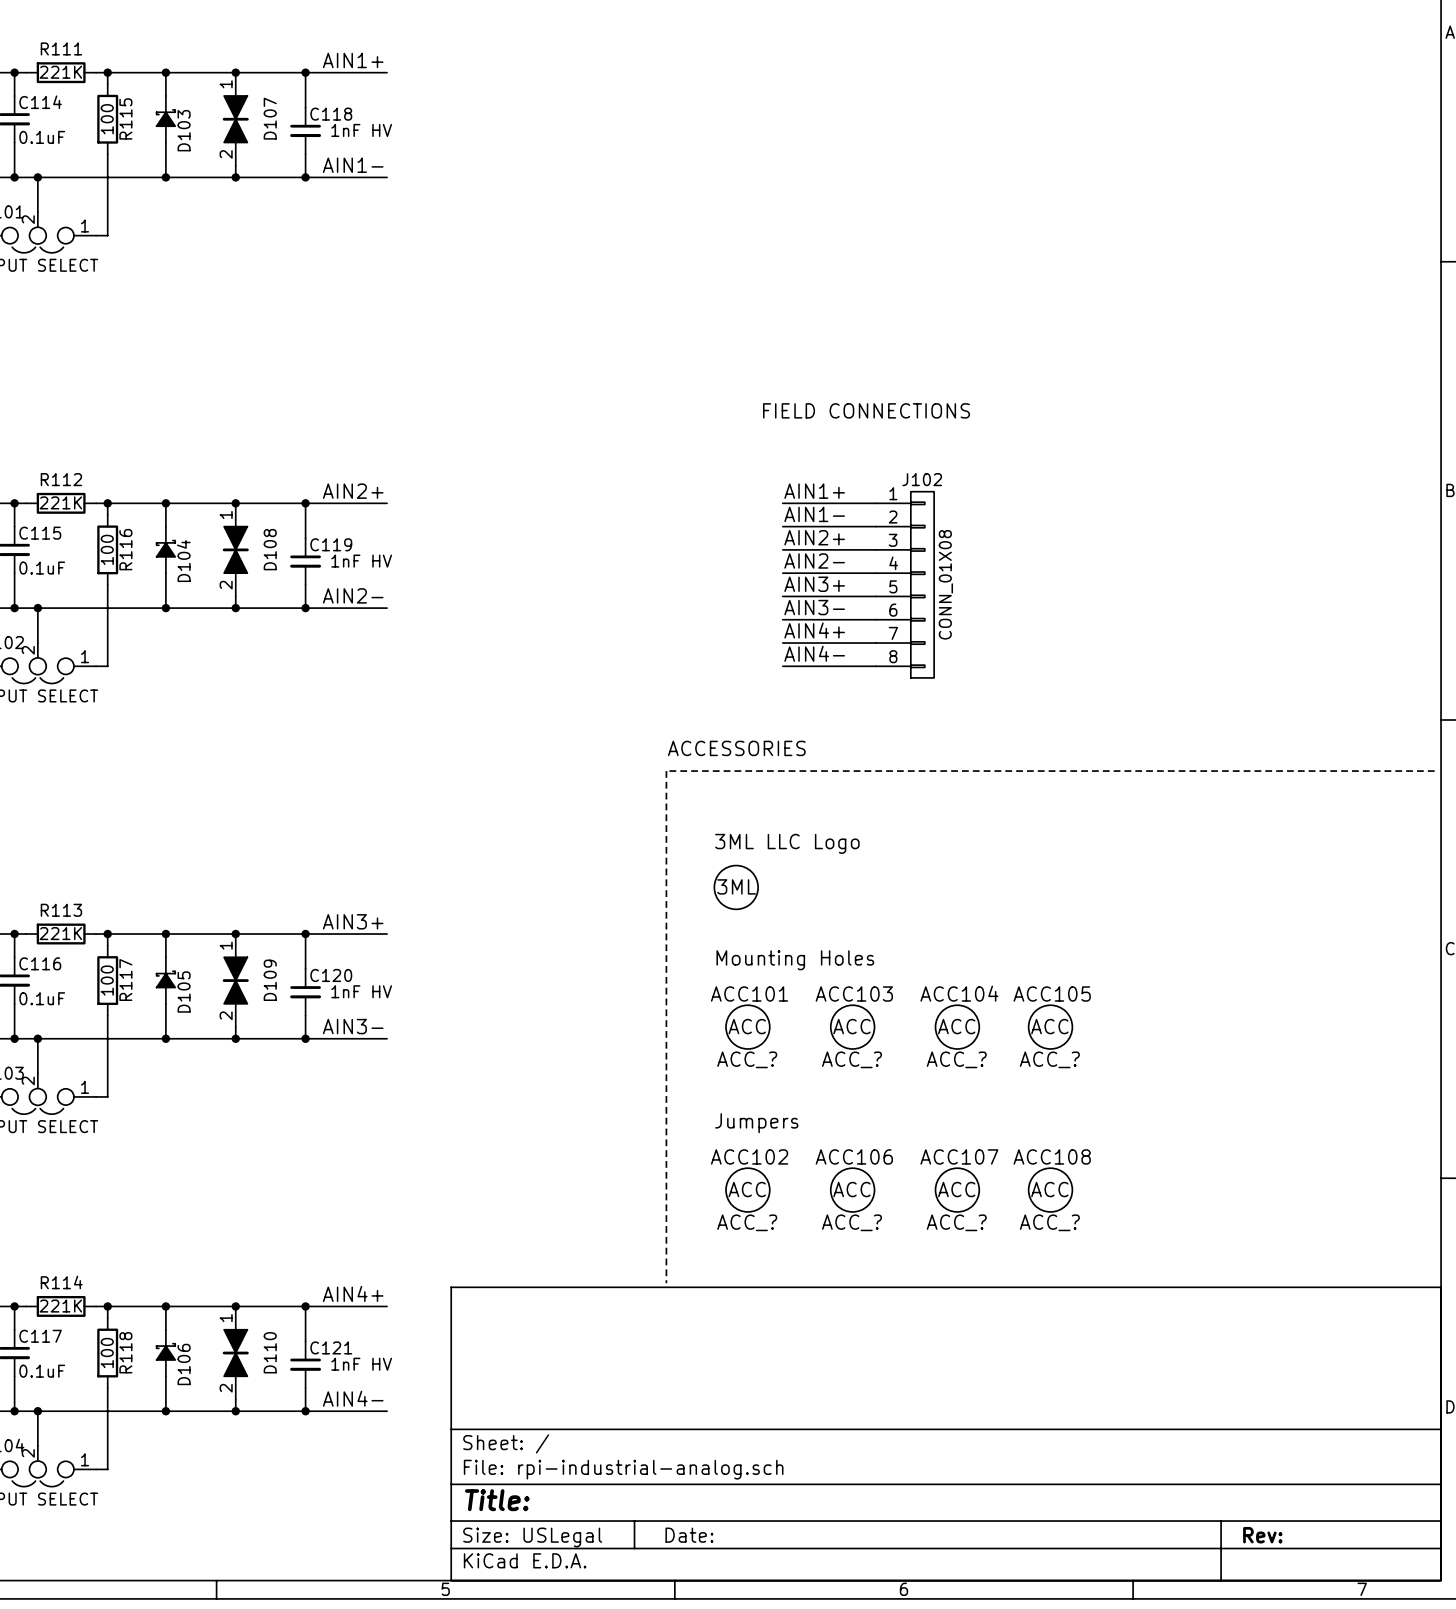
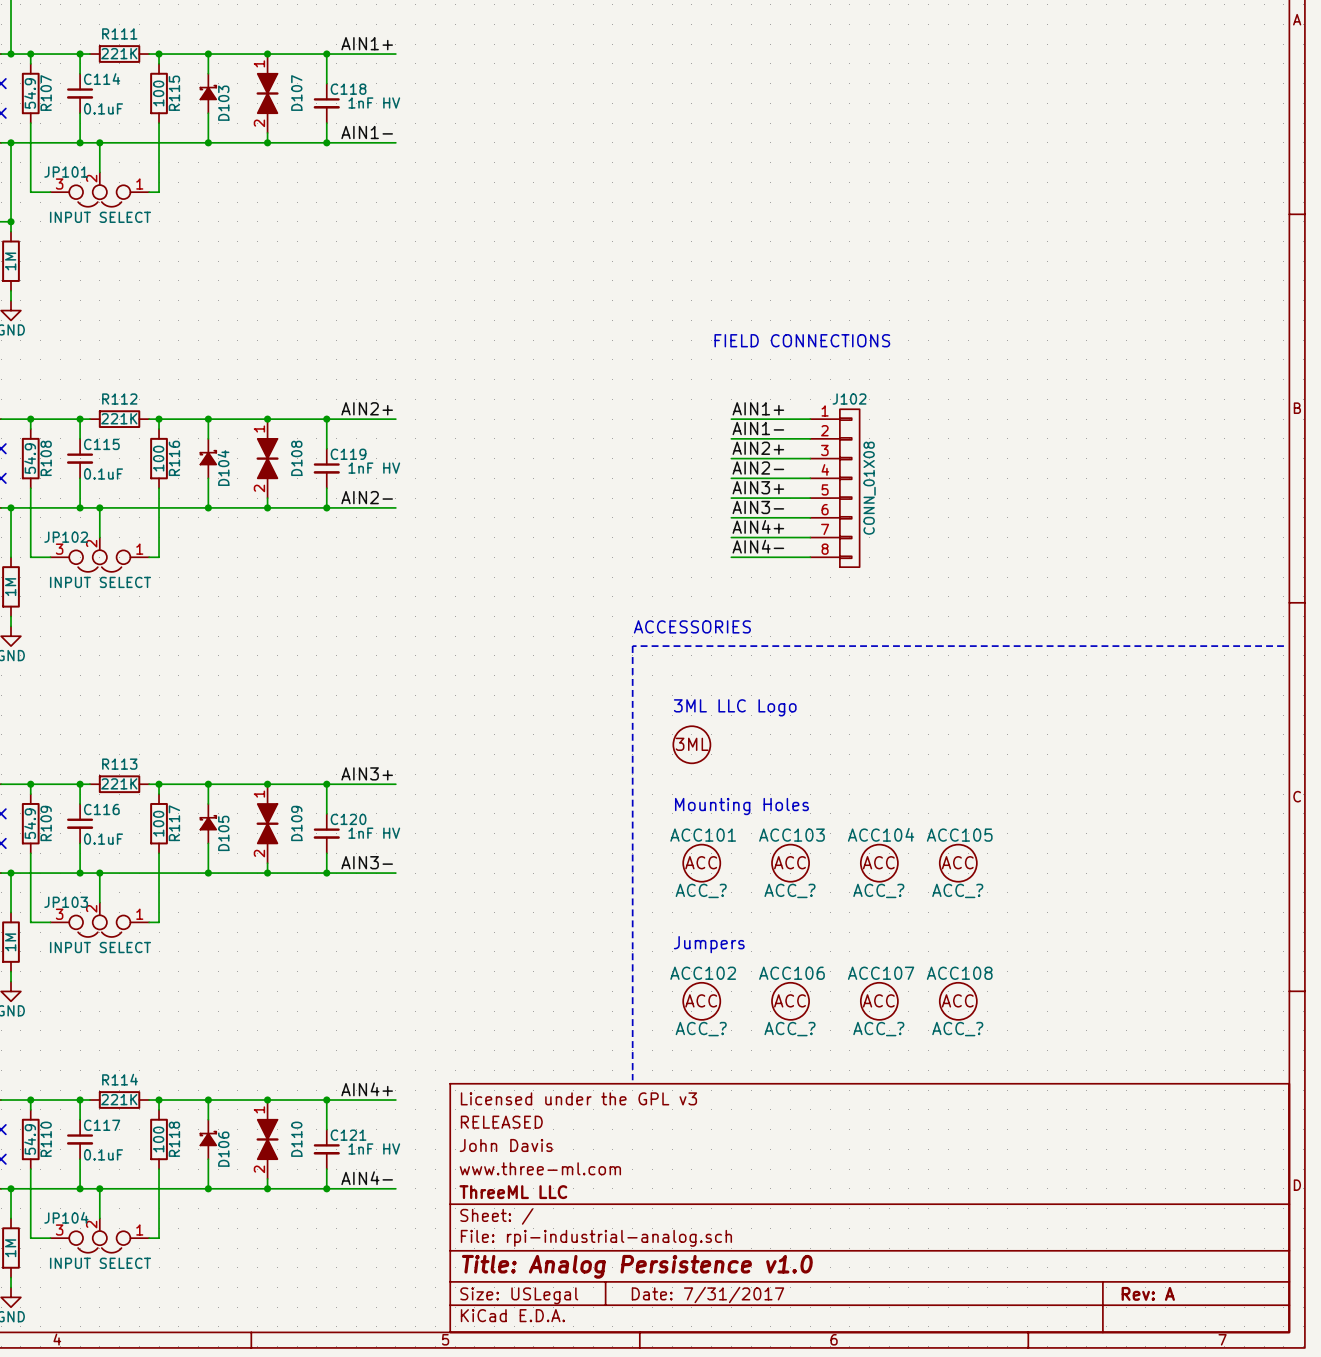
title block: none -> Licensed under the GPL v3 (578, 1098)
title block: none -> RELEASED (501, 1122)
title block: none -> John Davis (506, 1145)
title block: none -> www.three-ml.com (540, 1168)
title block: none -> ThreeML LLC (513, 1192)
title block: Title: (497, 1500) -> Title: Analog Persistence v1.0 (637, 1266)
title block: Date: (689, 1535) -> Date: 7/31/2017 (707, 1295)
title block: Rev: (1262, 1535) -> Rev: A (1148, 1293)

